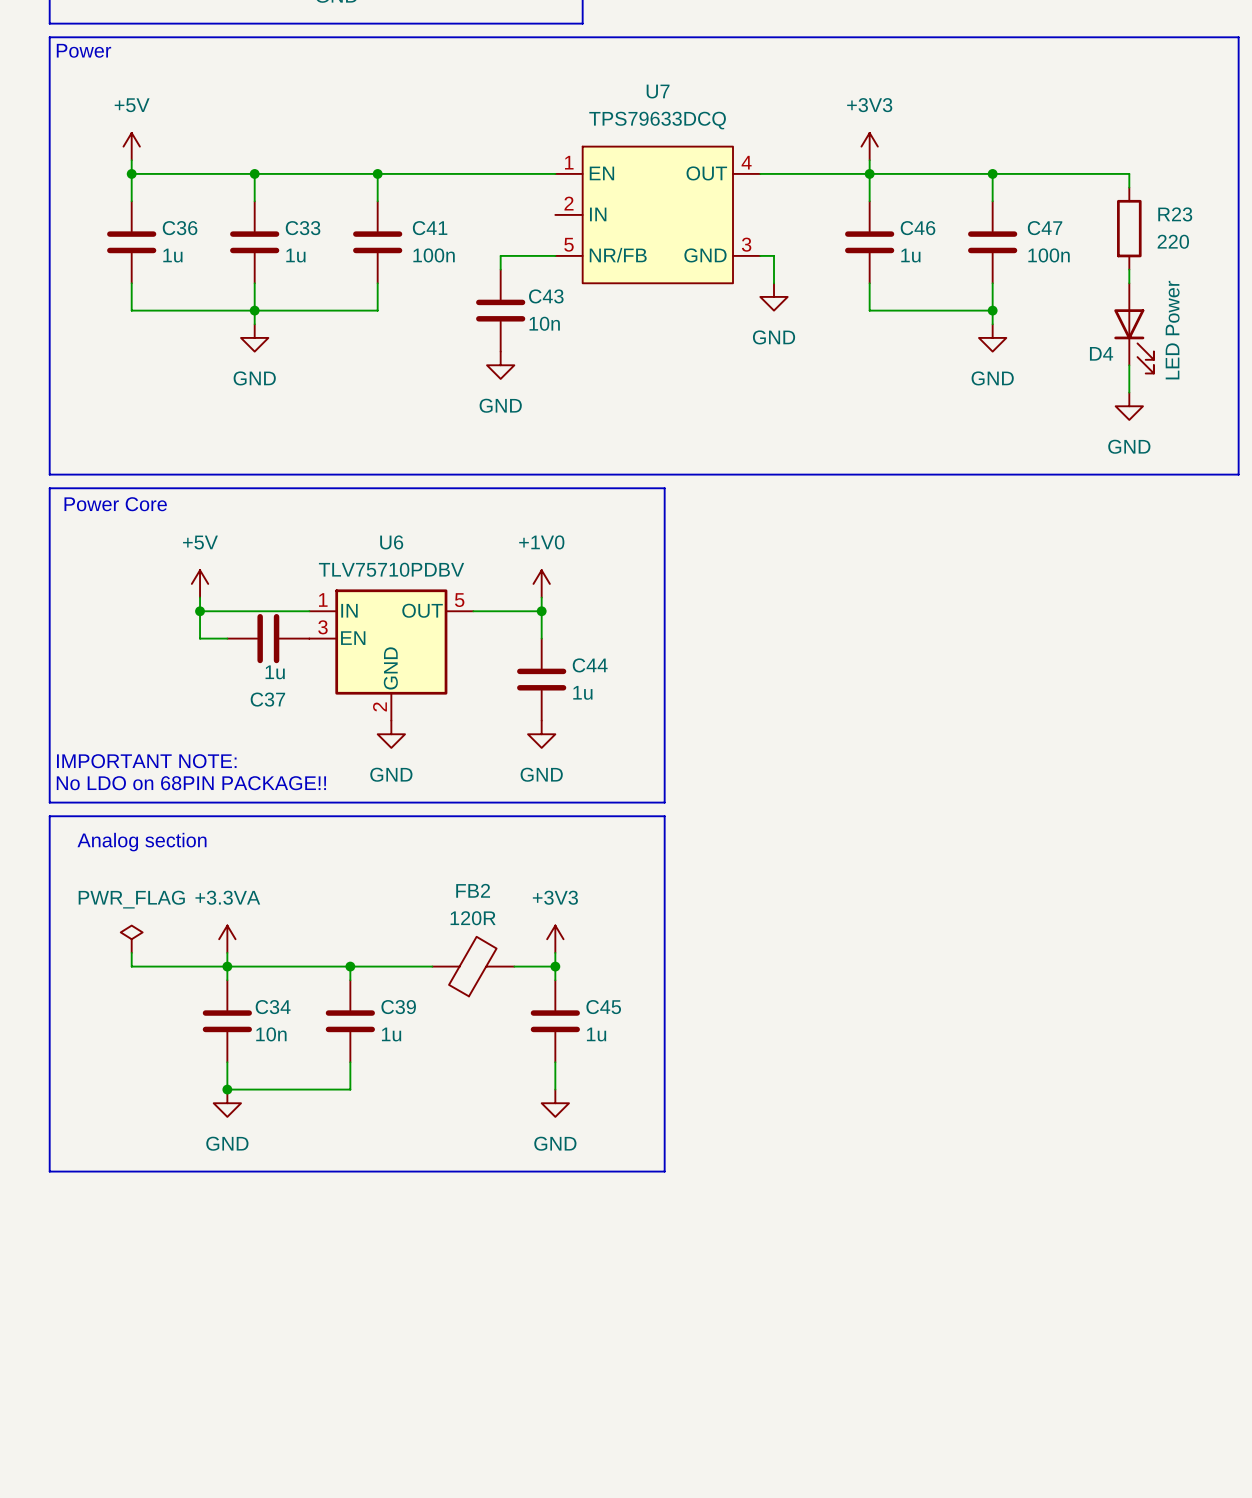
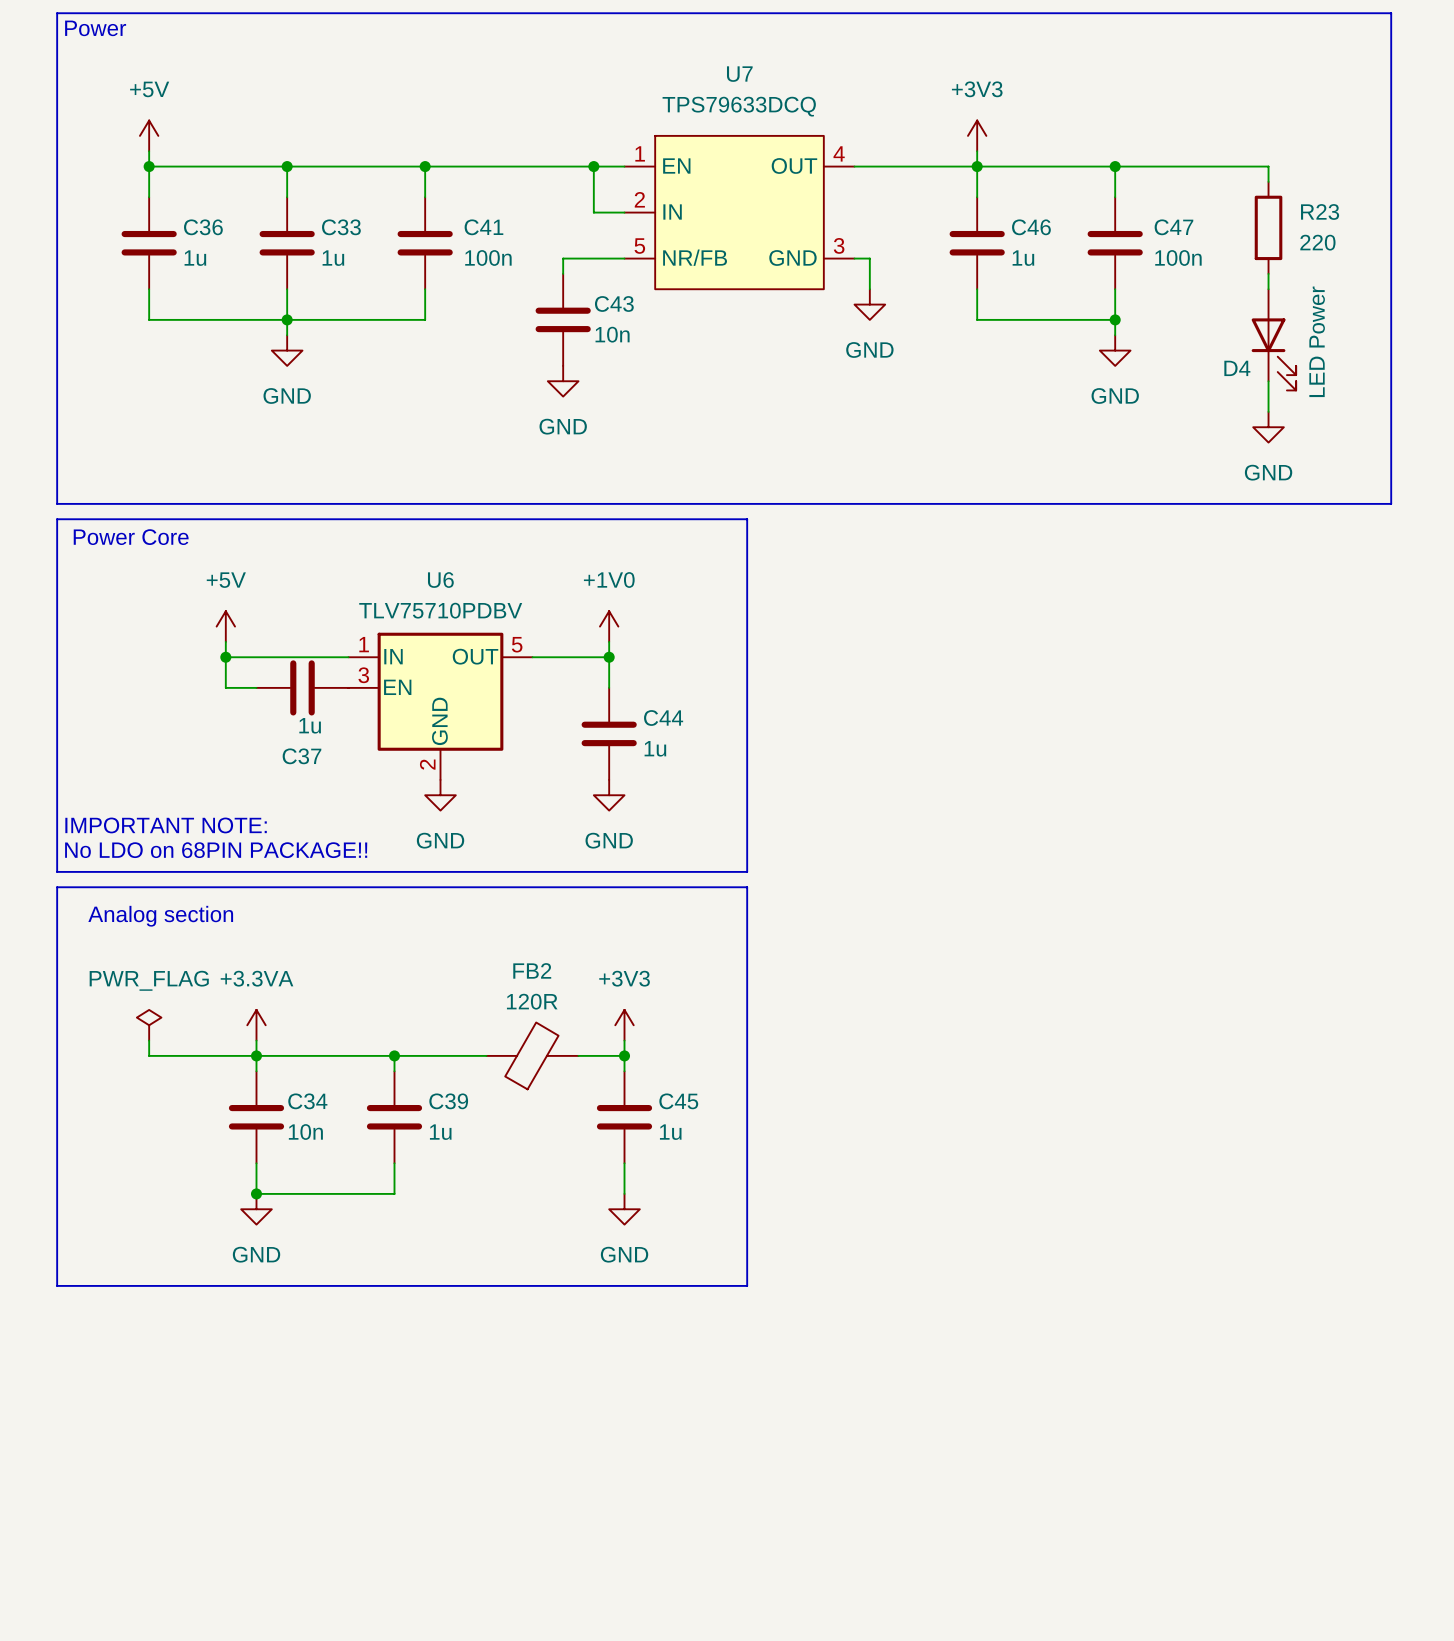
wire: none -> (593, 166) (593, 212) (624, 212)
junction: none -> (593, 166)

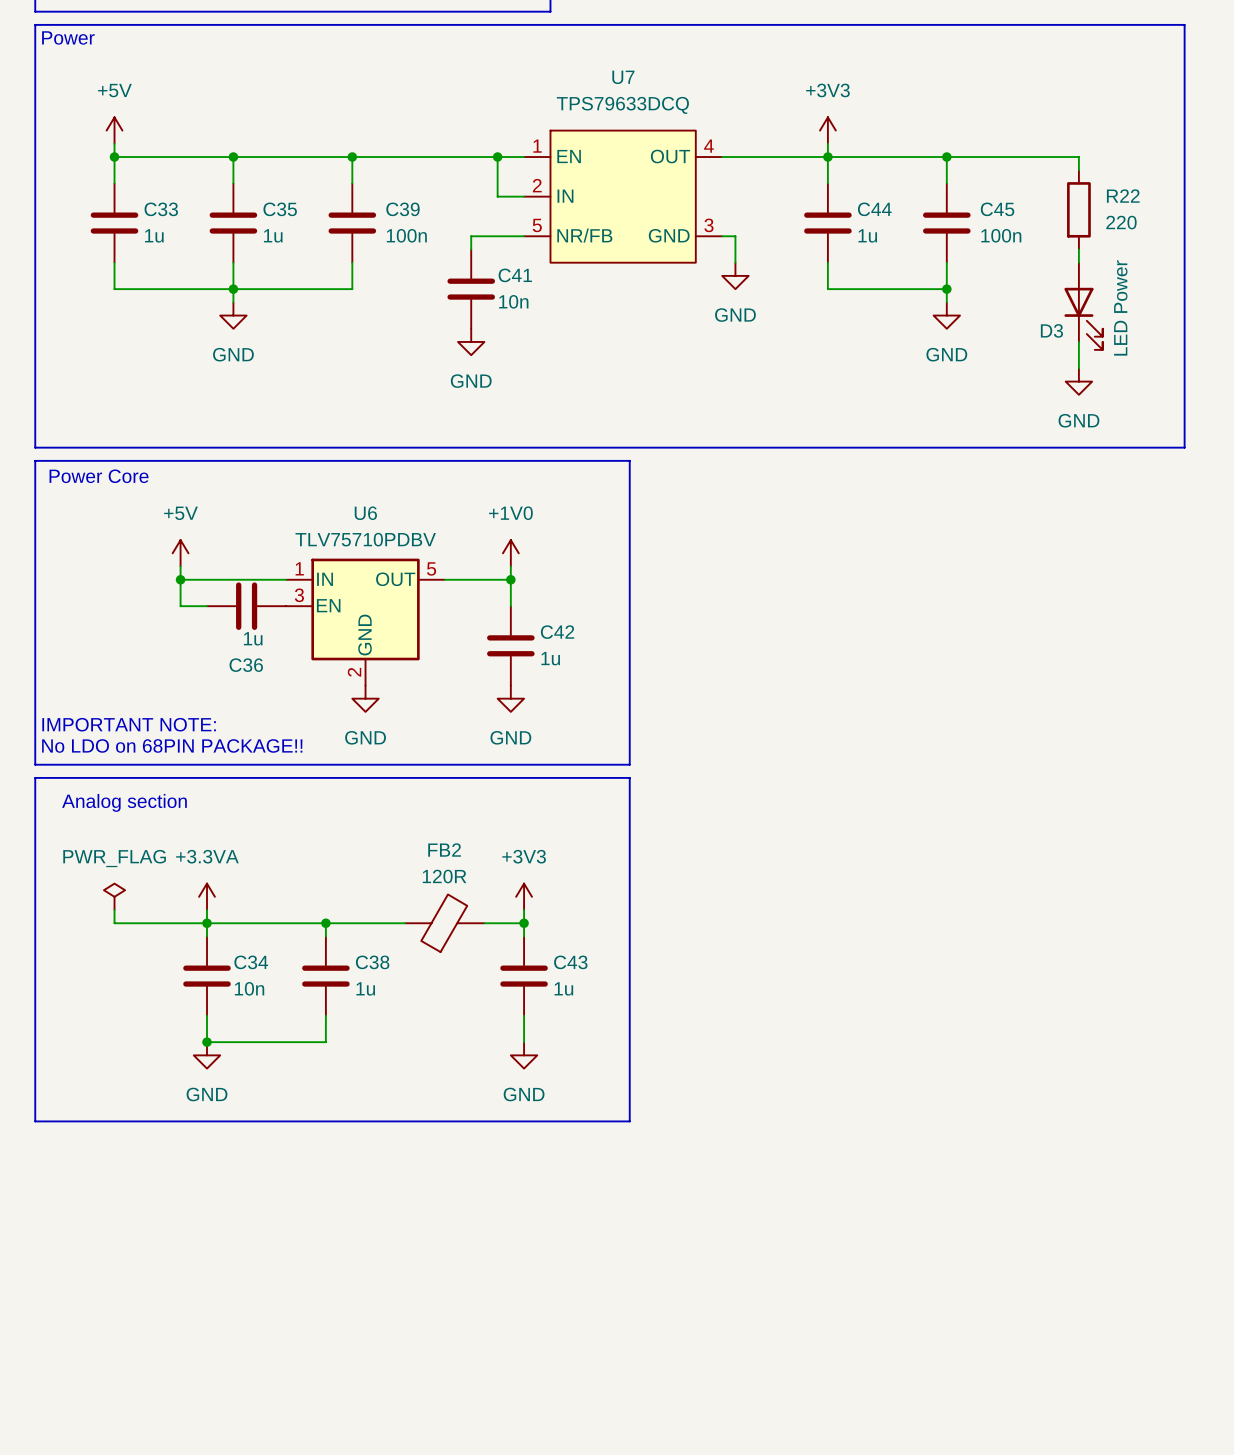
R23 name: R23 (1320, 211) -> R22 (1123, 196)
C36 name: C36 (203, 227) -> C33 (161, 209)
C33 name: C33 (341, 227) -> C35 (280, 209)
C41 name: C41 (483, 227) -> C39 (402, 209)
C46 name: C46 (1031, 227) -> C44 (874, 209)
C47 name: C47 (1173, 227) -> C45 (997, 209)
C43 name: C43 (614, 303) -> C41 (515, 275)
D4 name: D4 (1237, 368) -> D3 (1051, 330)
C44 name: C44 (663, 718) -> C42 (557, 632)
C37 name: C37 (301, 756) -> C36 (246, 665)
C39 name: C39 (448, 1101) -> C38 (372, 962)
C45 name: C45 (678, 1101) -> C43 (570, 962)

